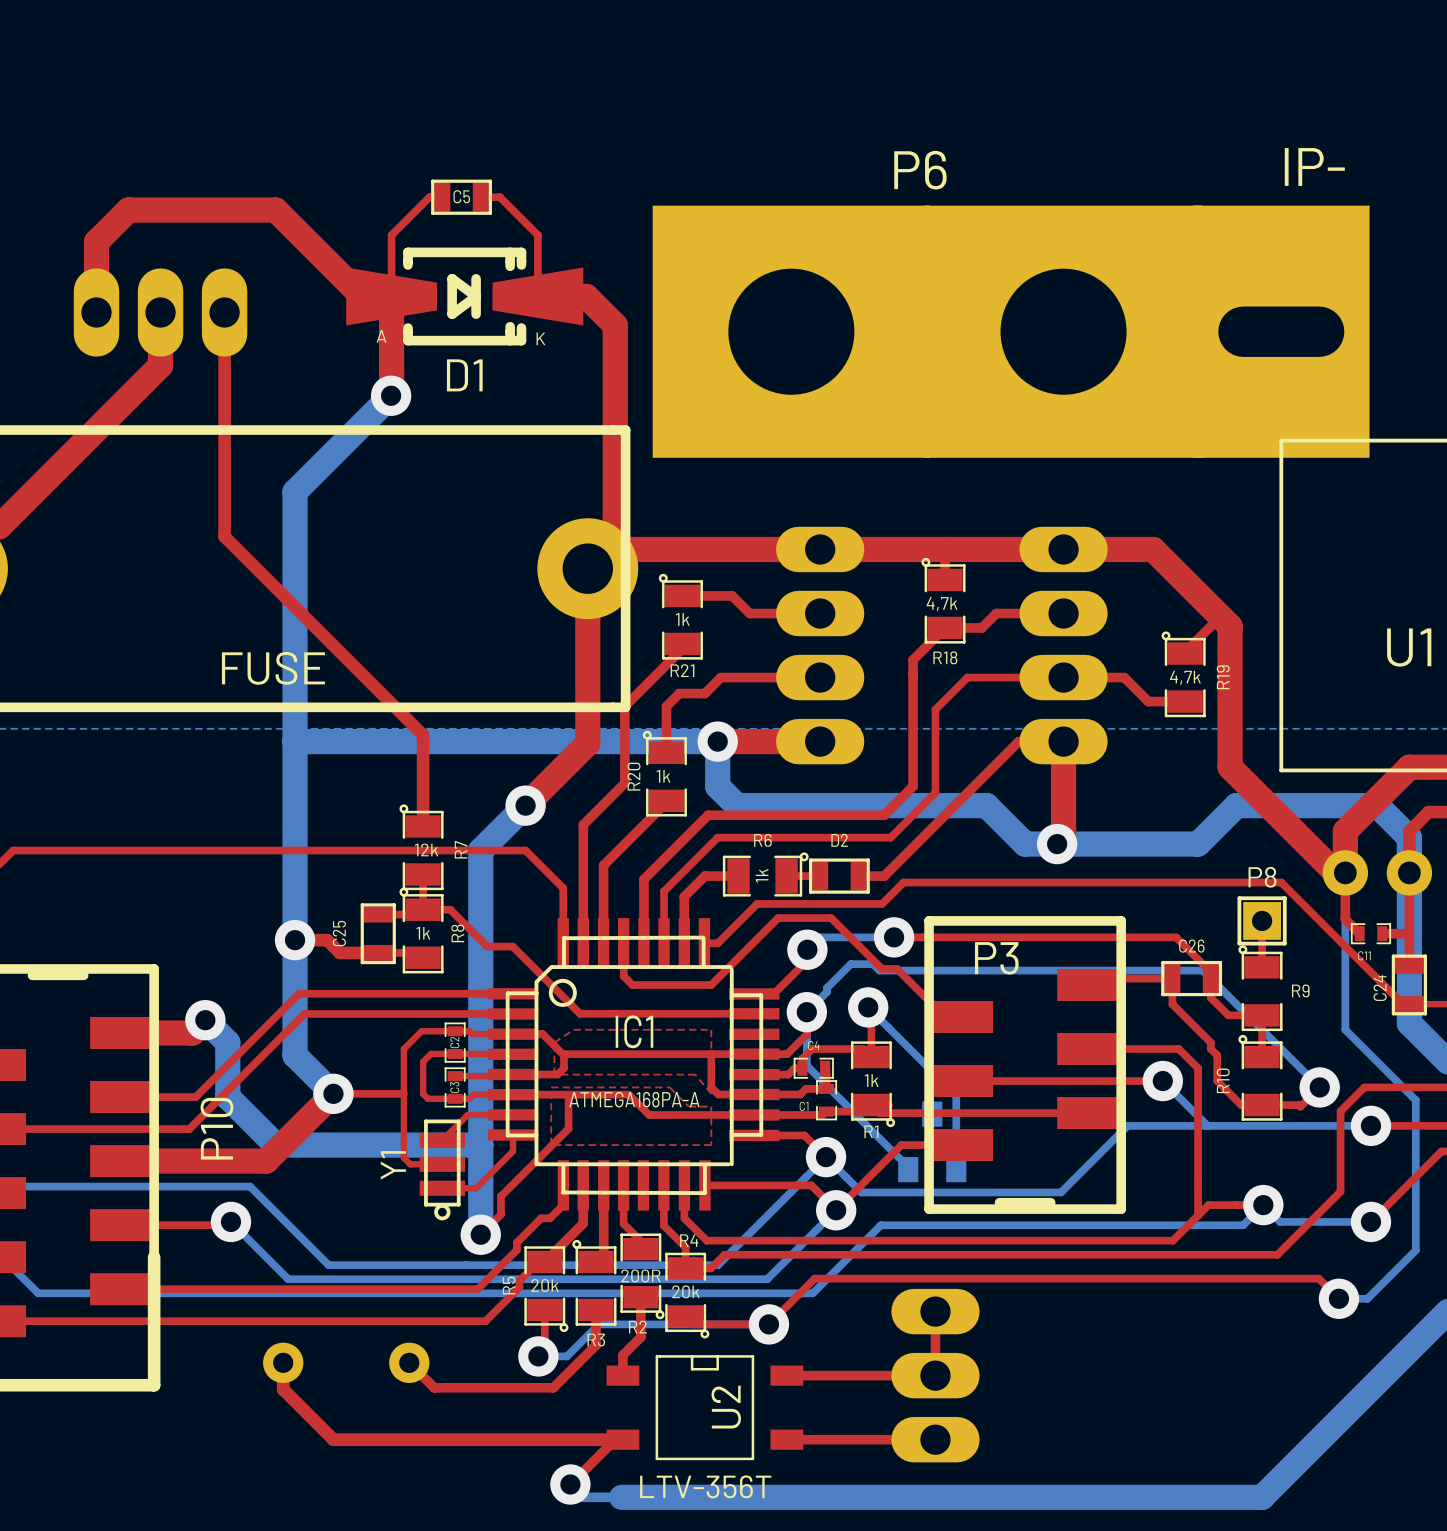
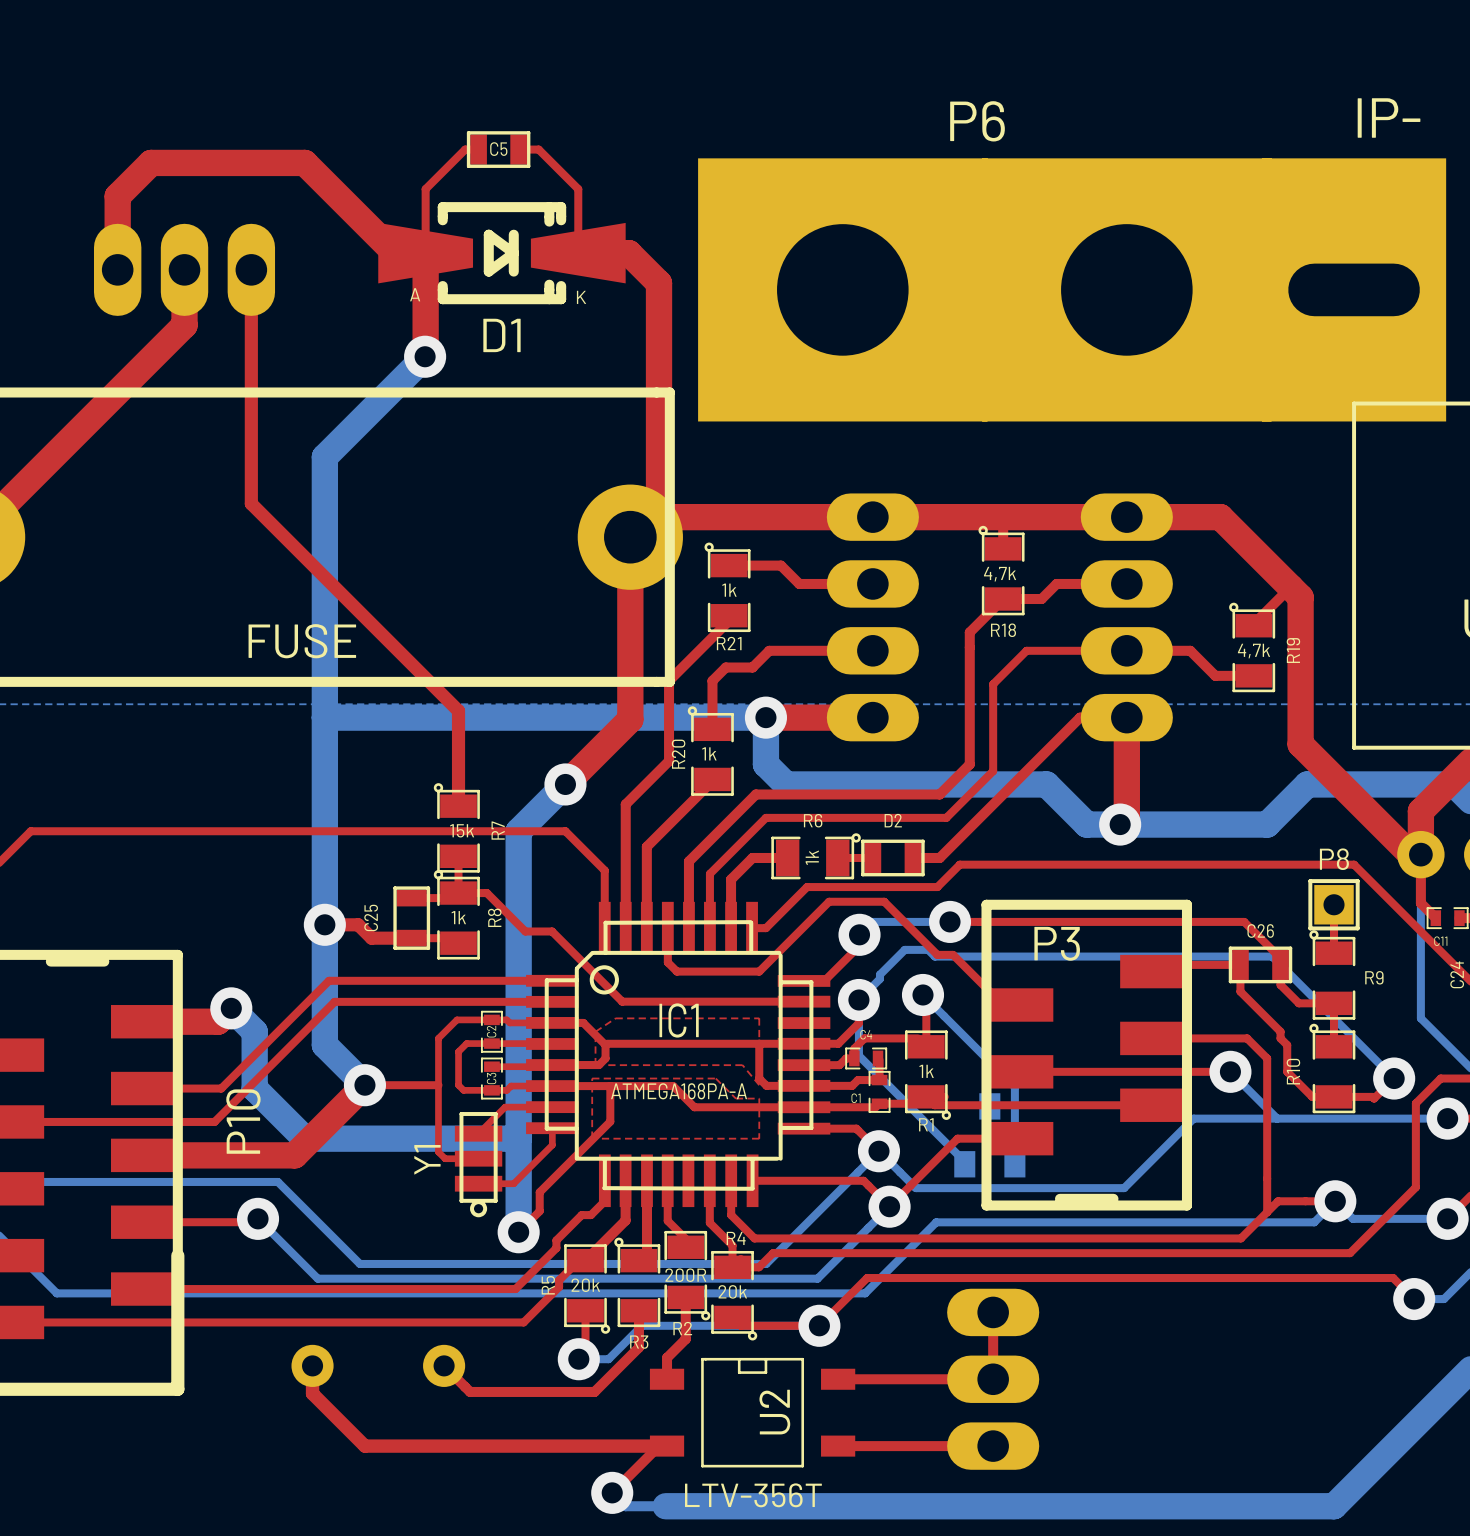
R7 value: 12k (426, 849) -> 15k (462, 830)

